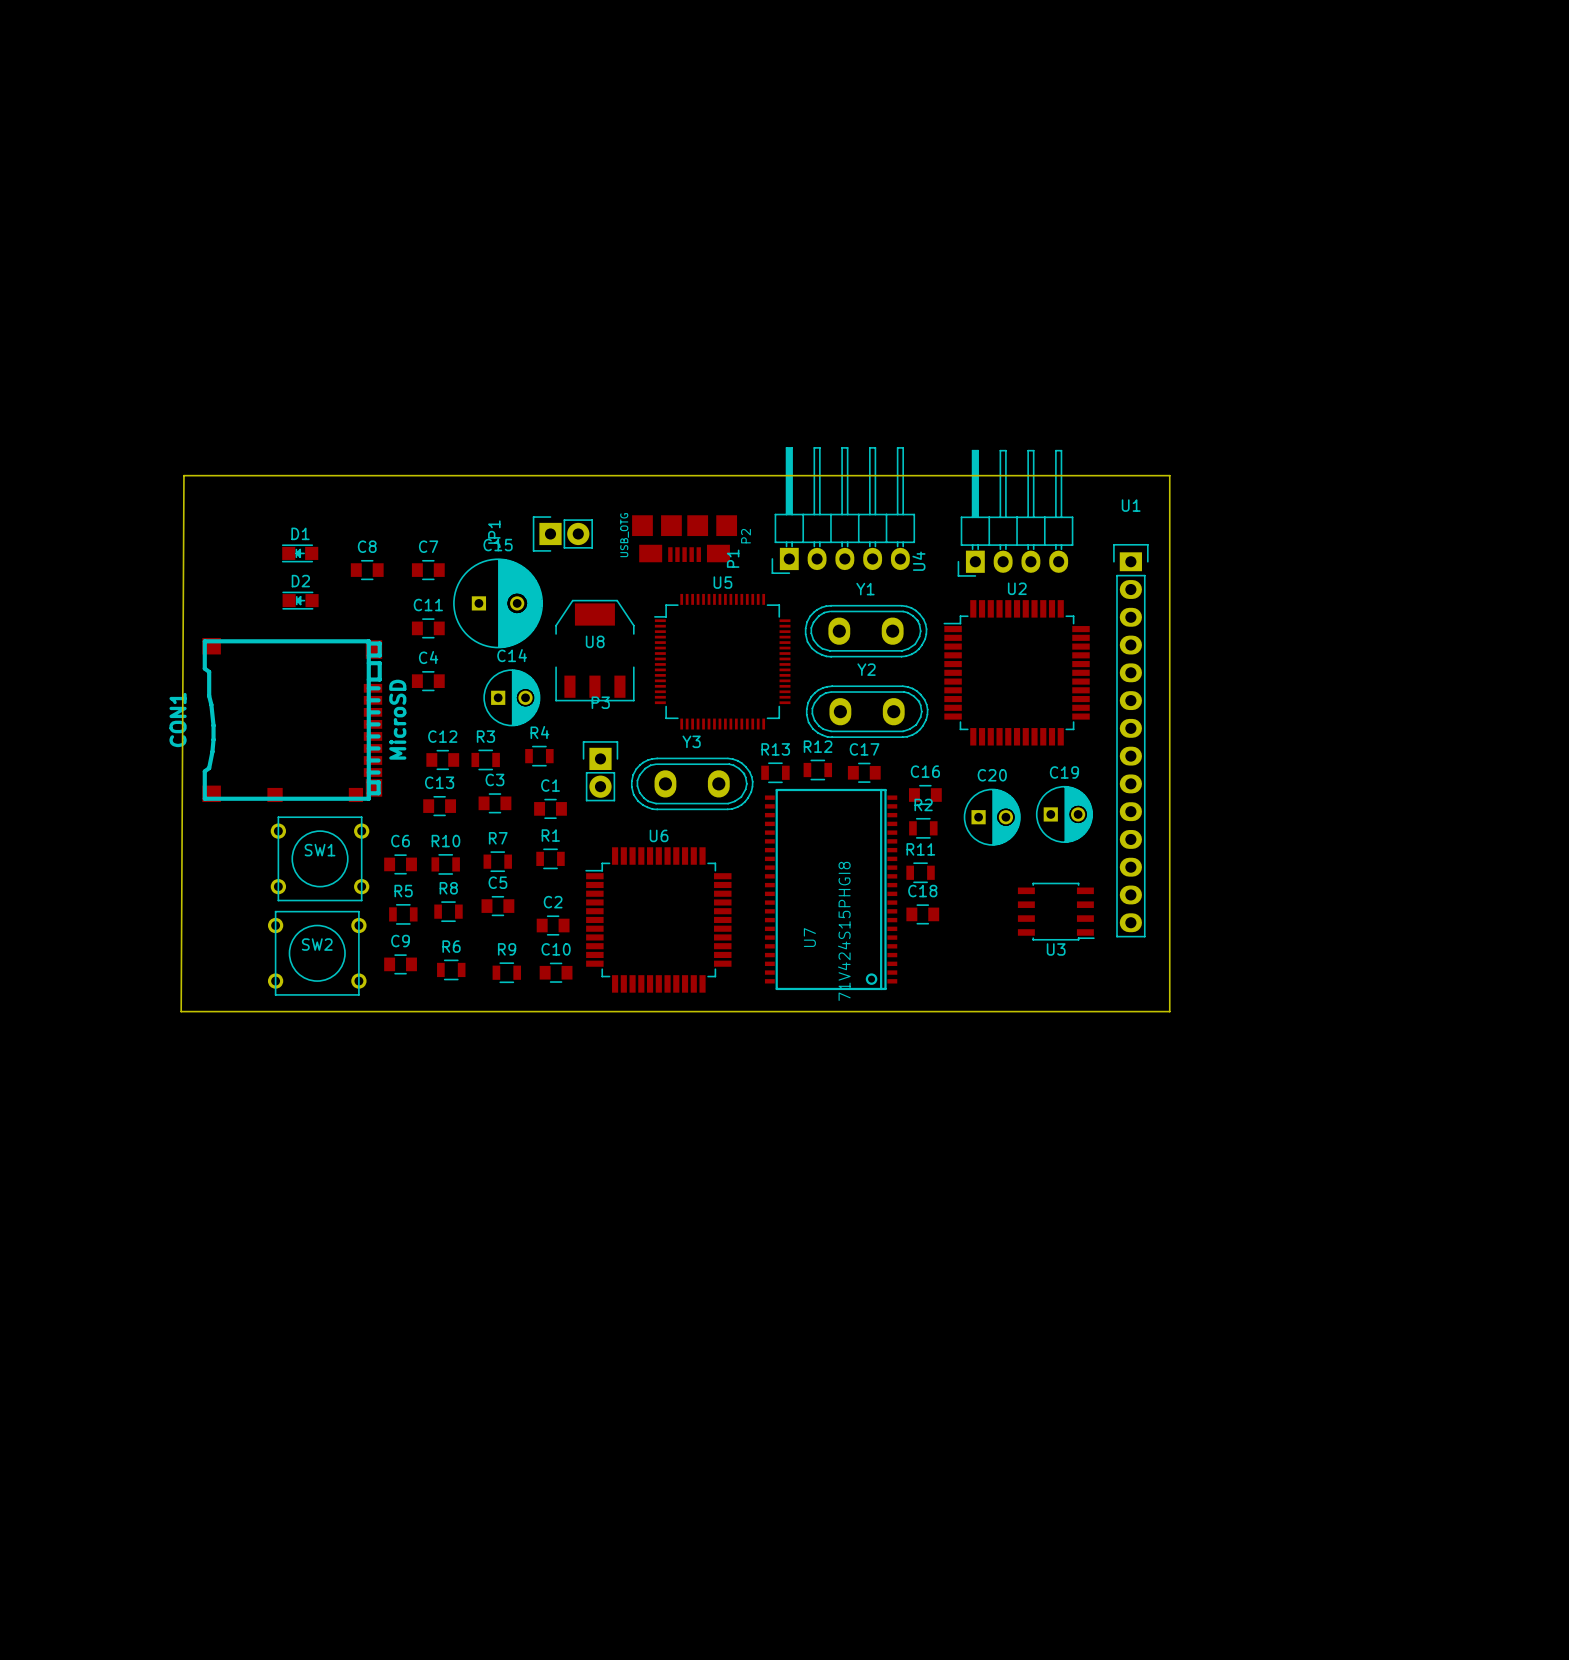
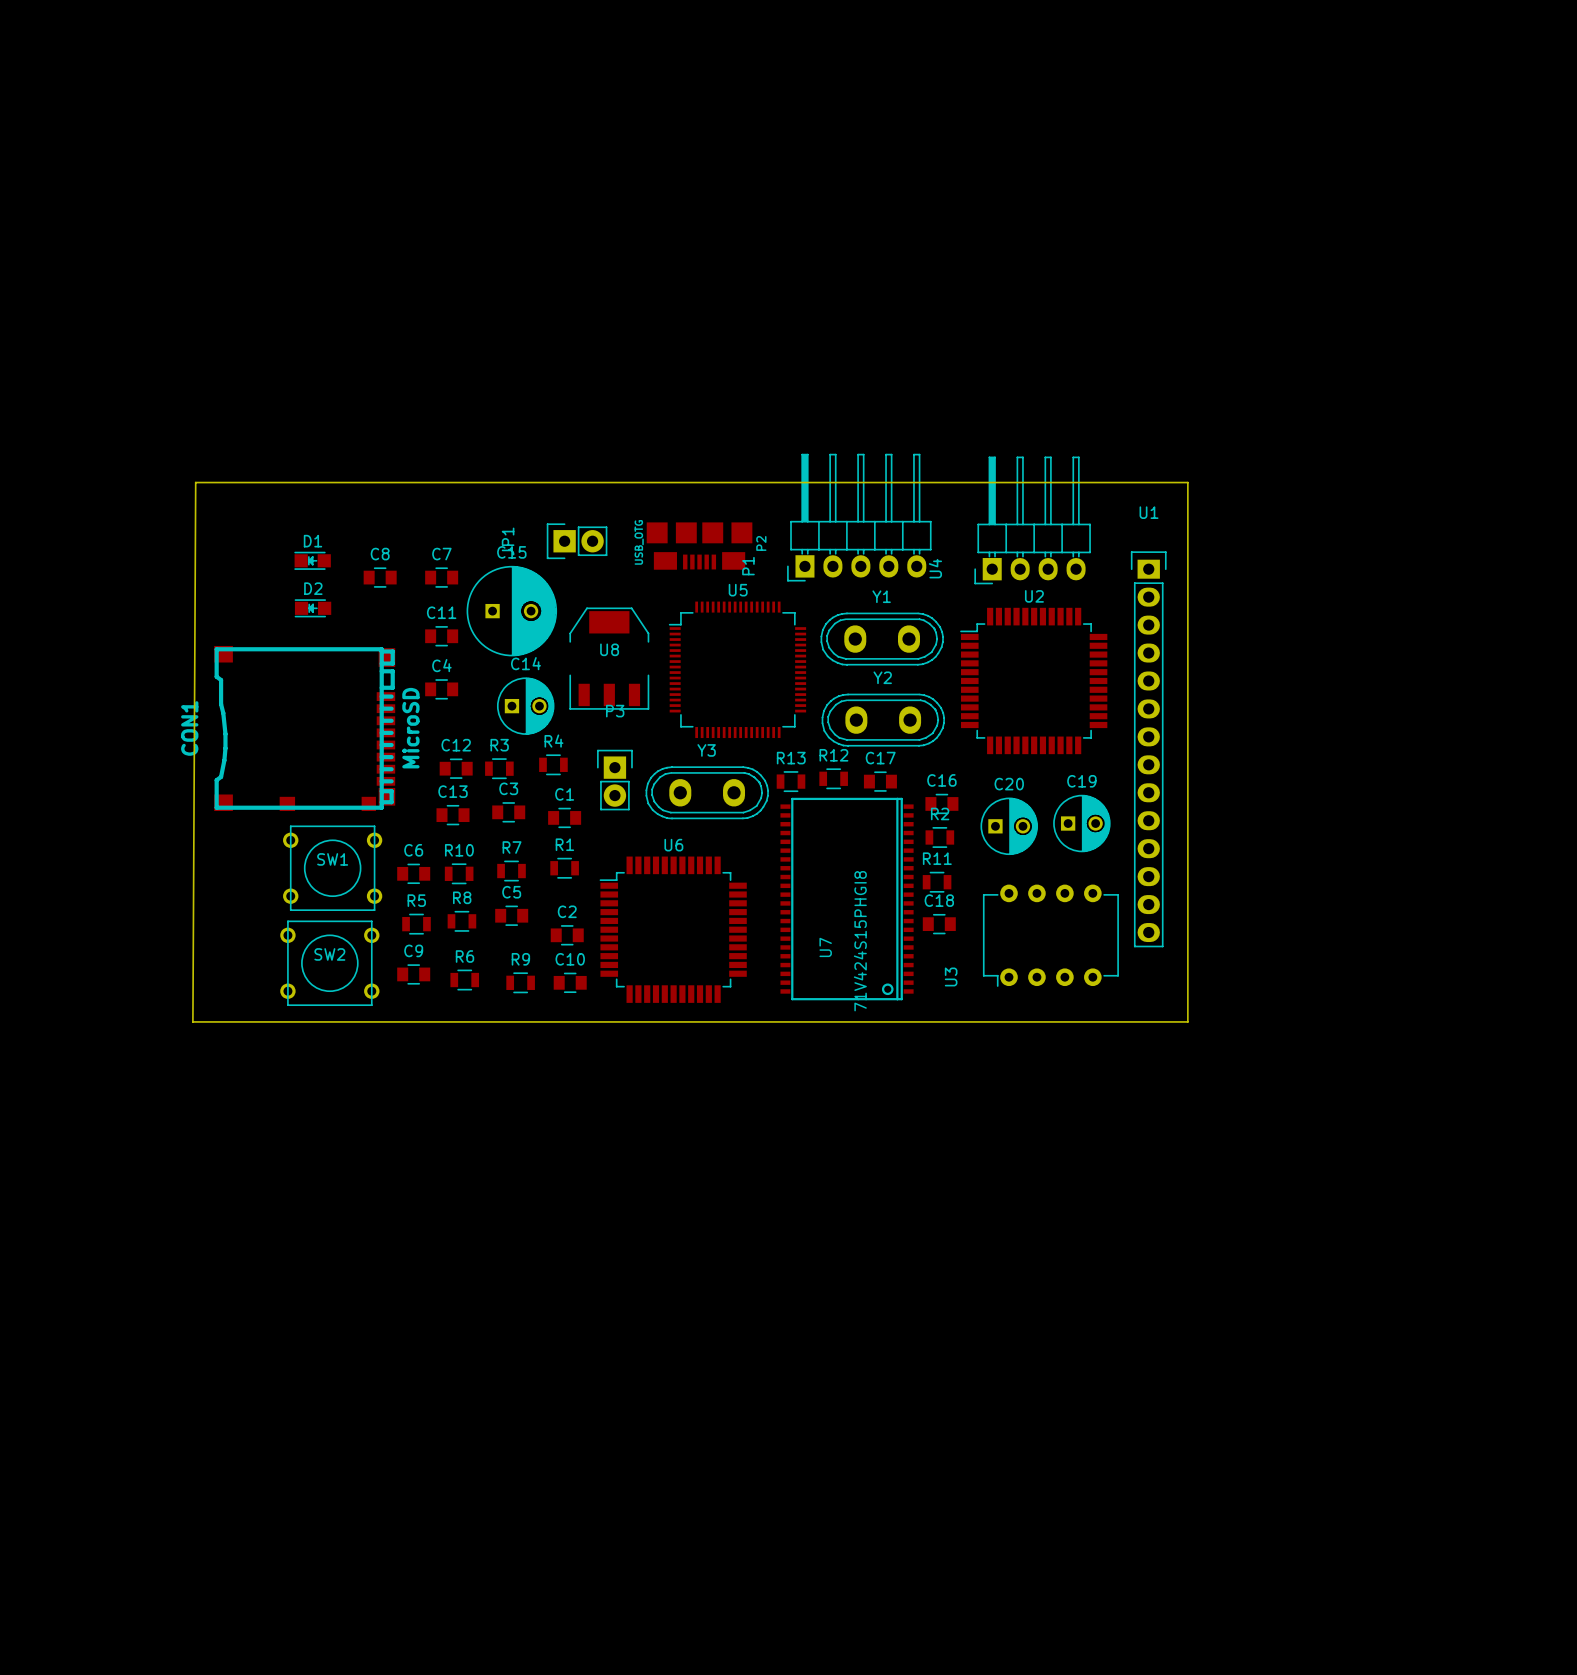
U3 footprint: [1017, 882, 1095, 941] -> [982, 884, 1119, 987]
U3 name position: U3 (1056, 949) -> U3 (951, 976)

